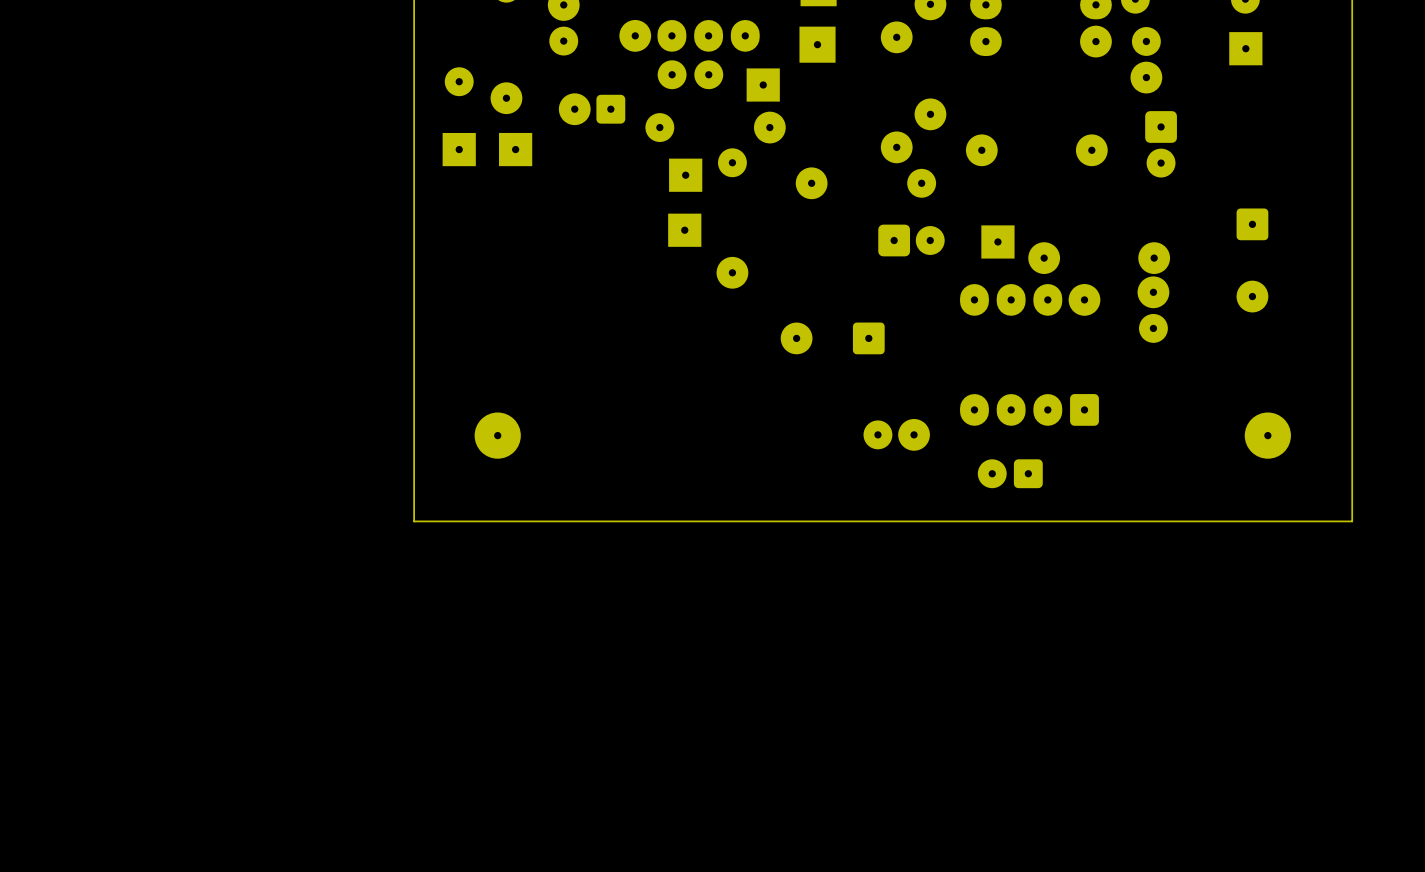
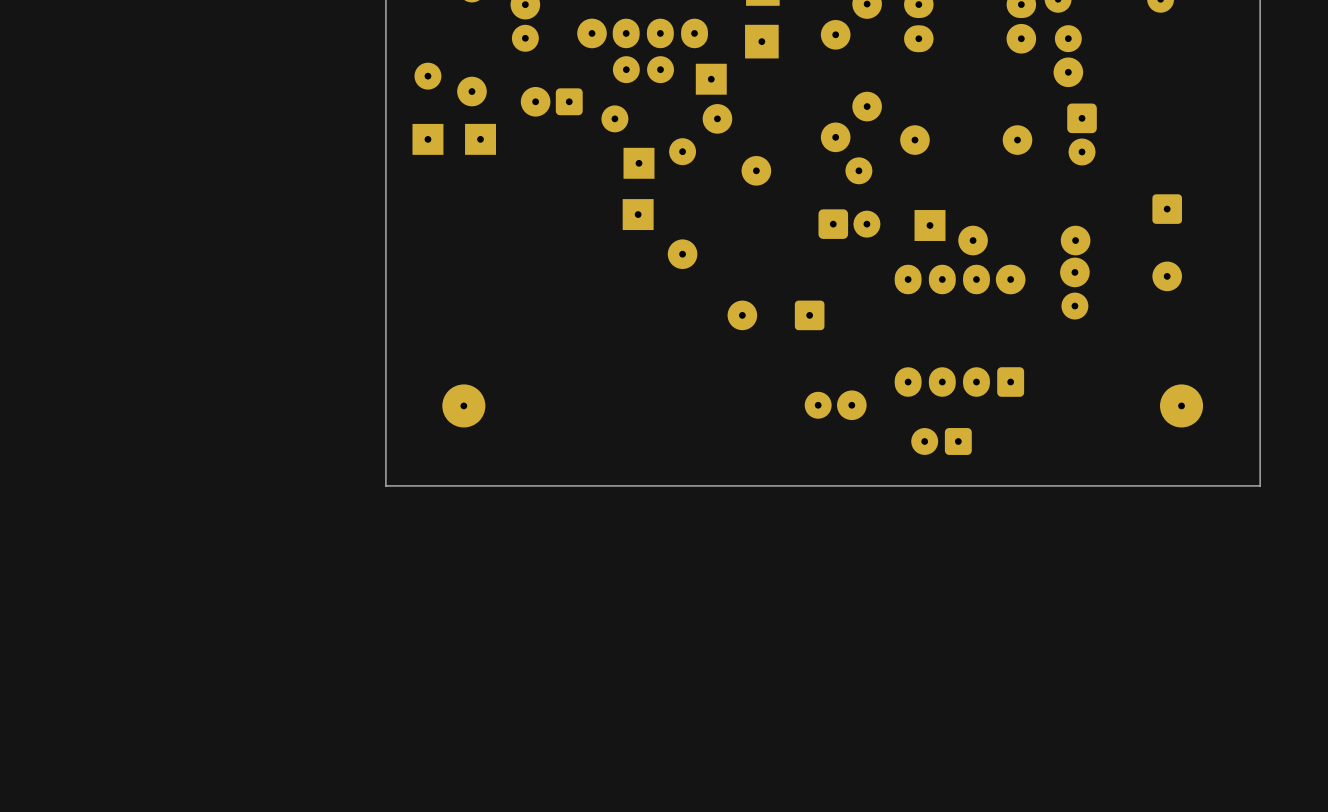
part: (1245, 48) -> none

